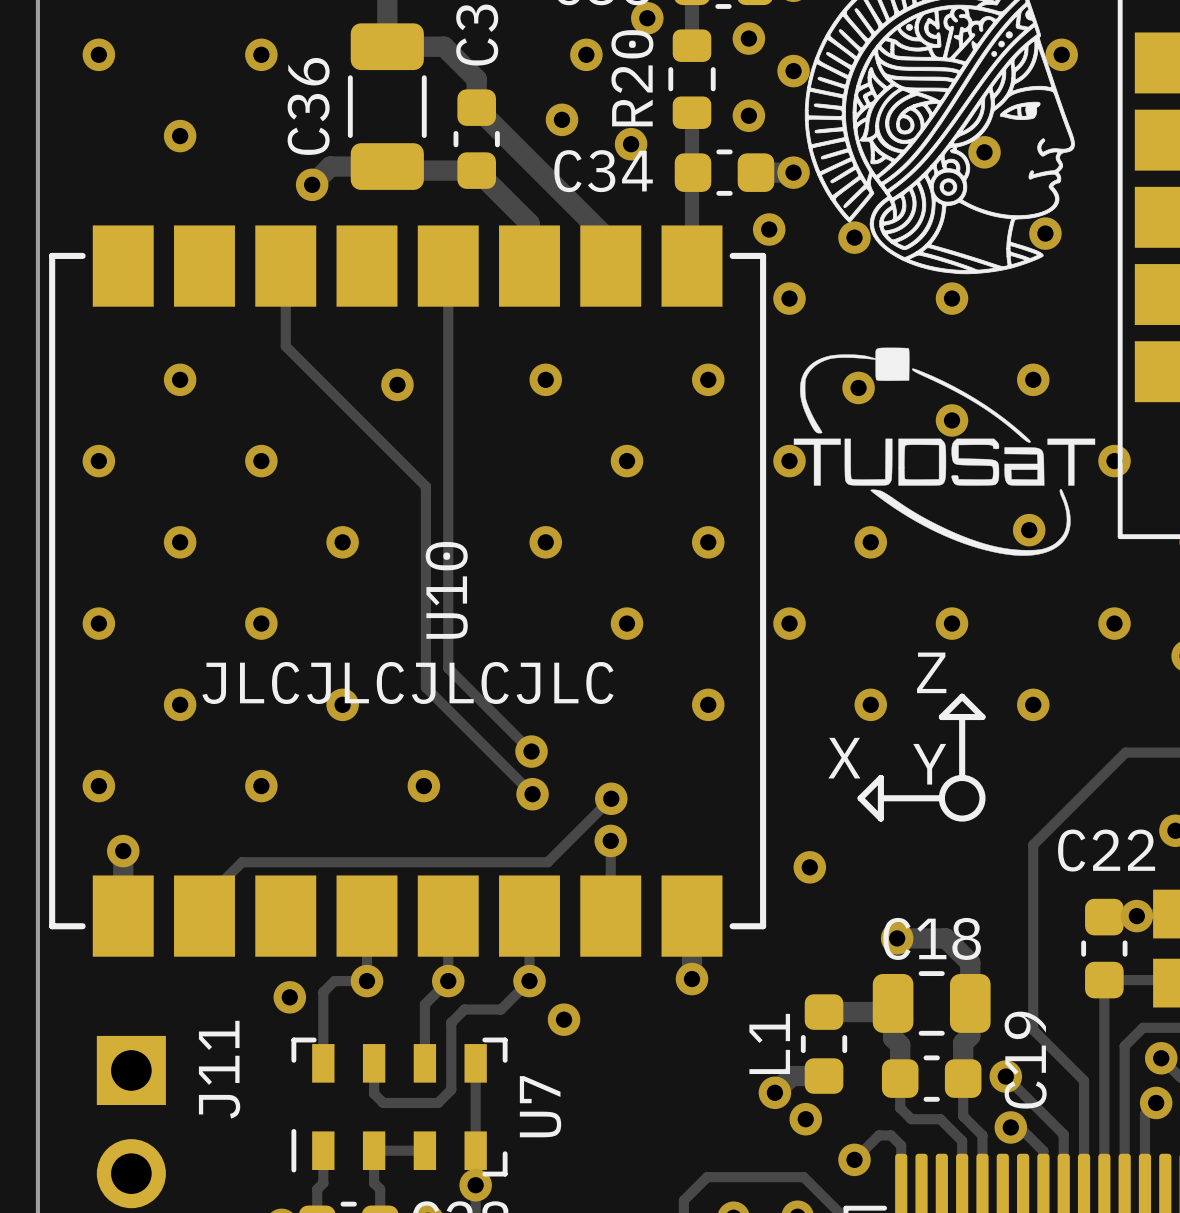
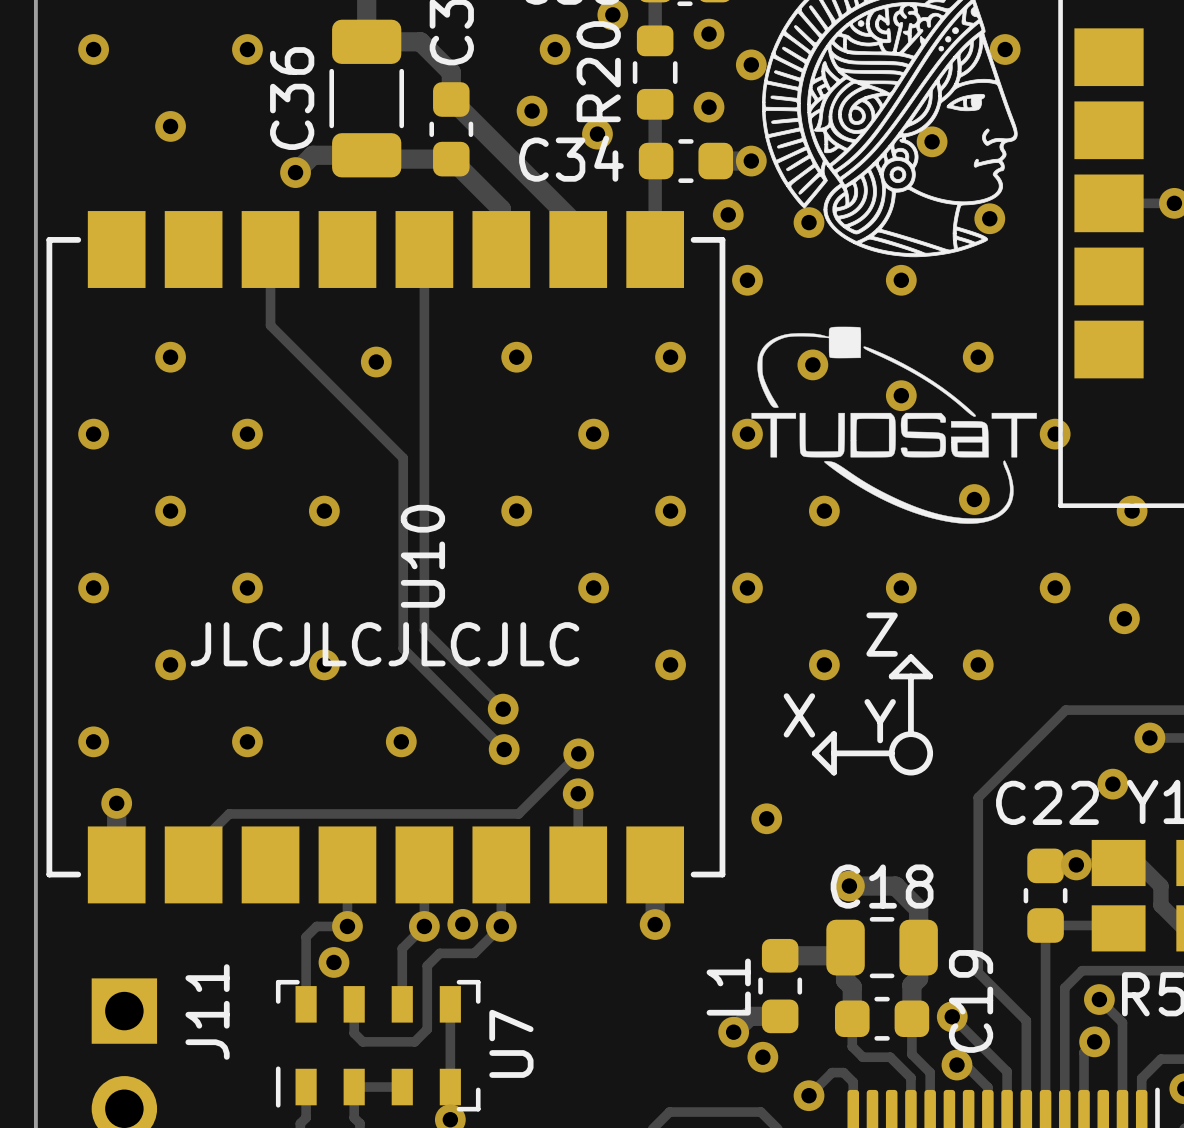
via position: (289, 997) -> (333, 962)
via position: (564, 1019) -> (462, 924)

